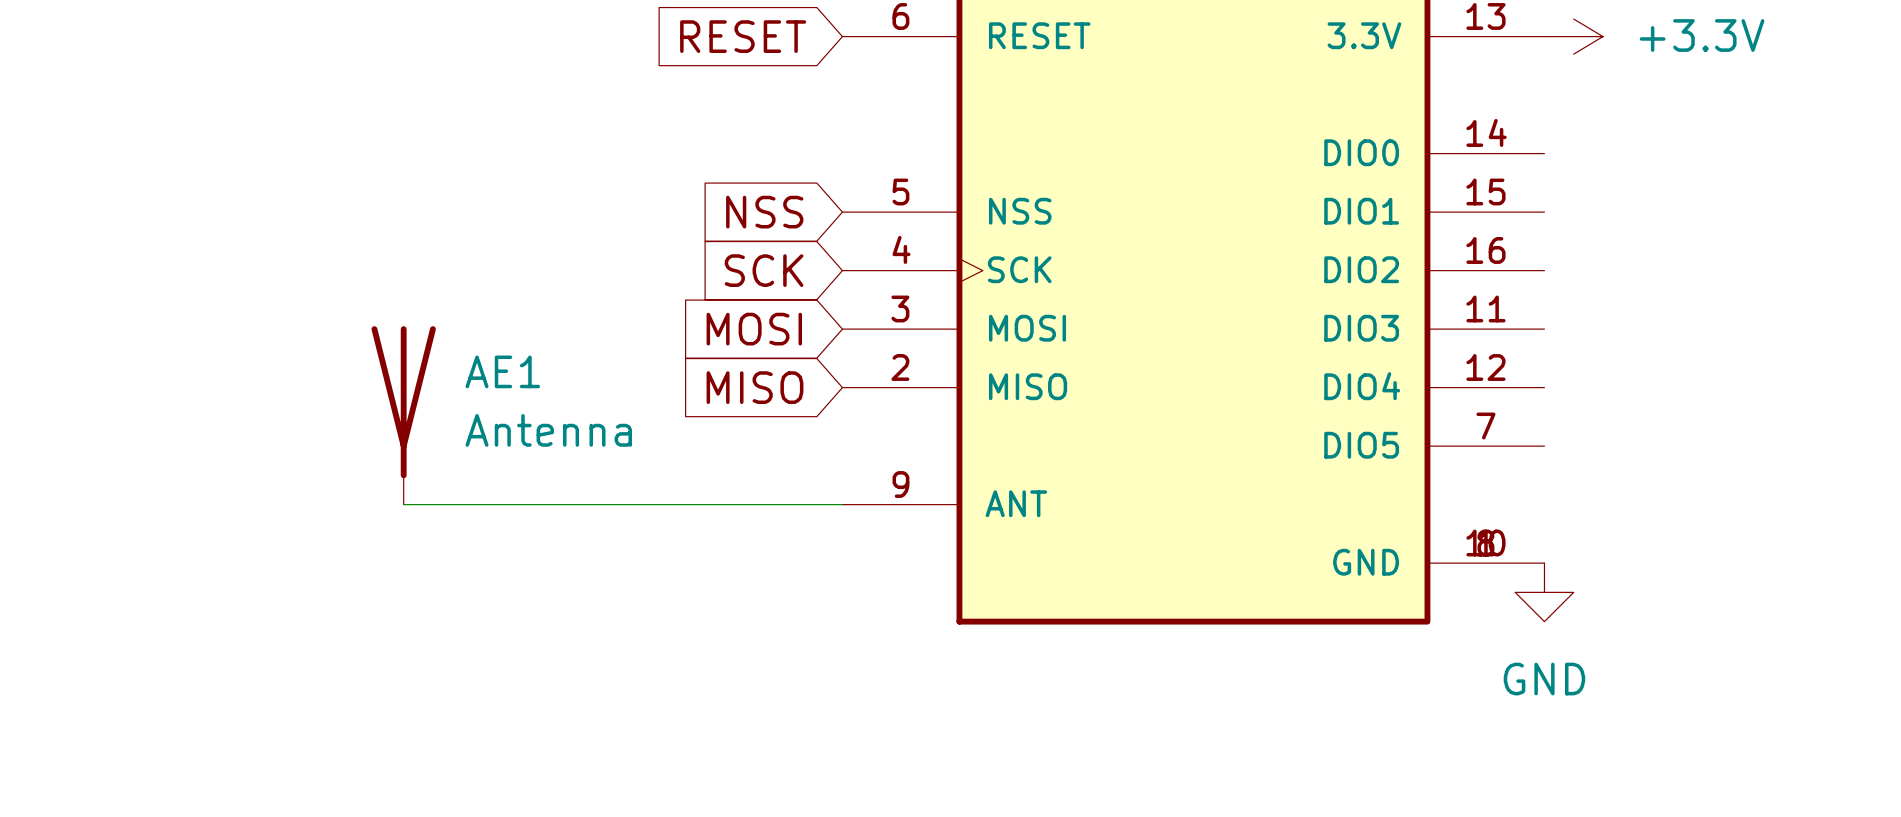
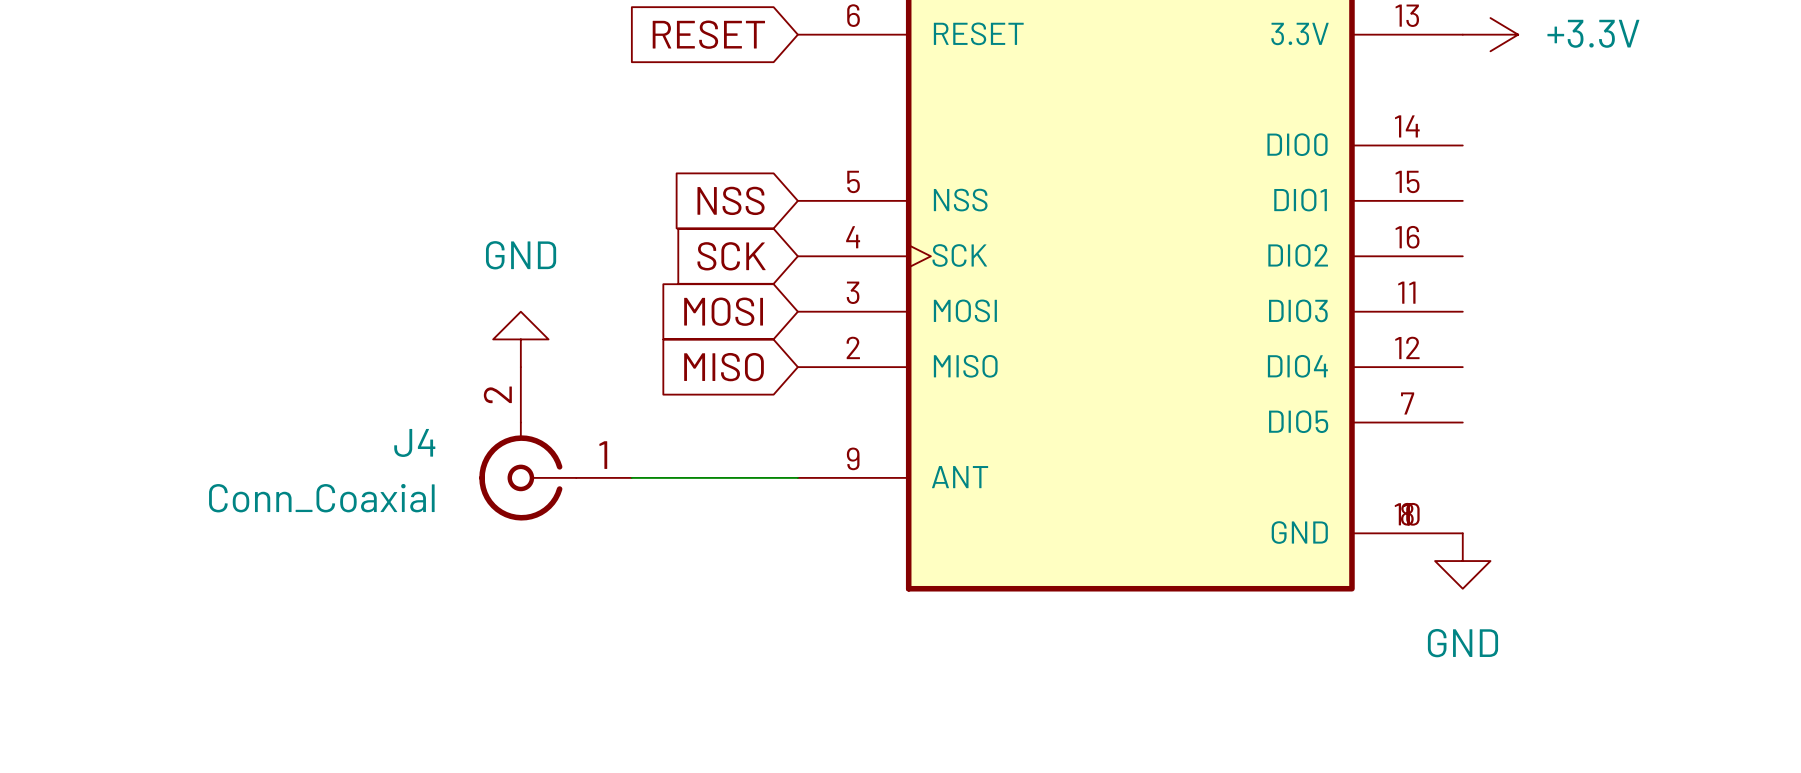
power symbol: none -> GND (520, 339)
AE1: Antenna (403, 415) -> none
J4: none -> Conn_Coaxial (555, 443)
wire: (403, 504) (666, 504) -> none

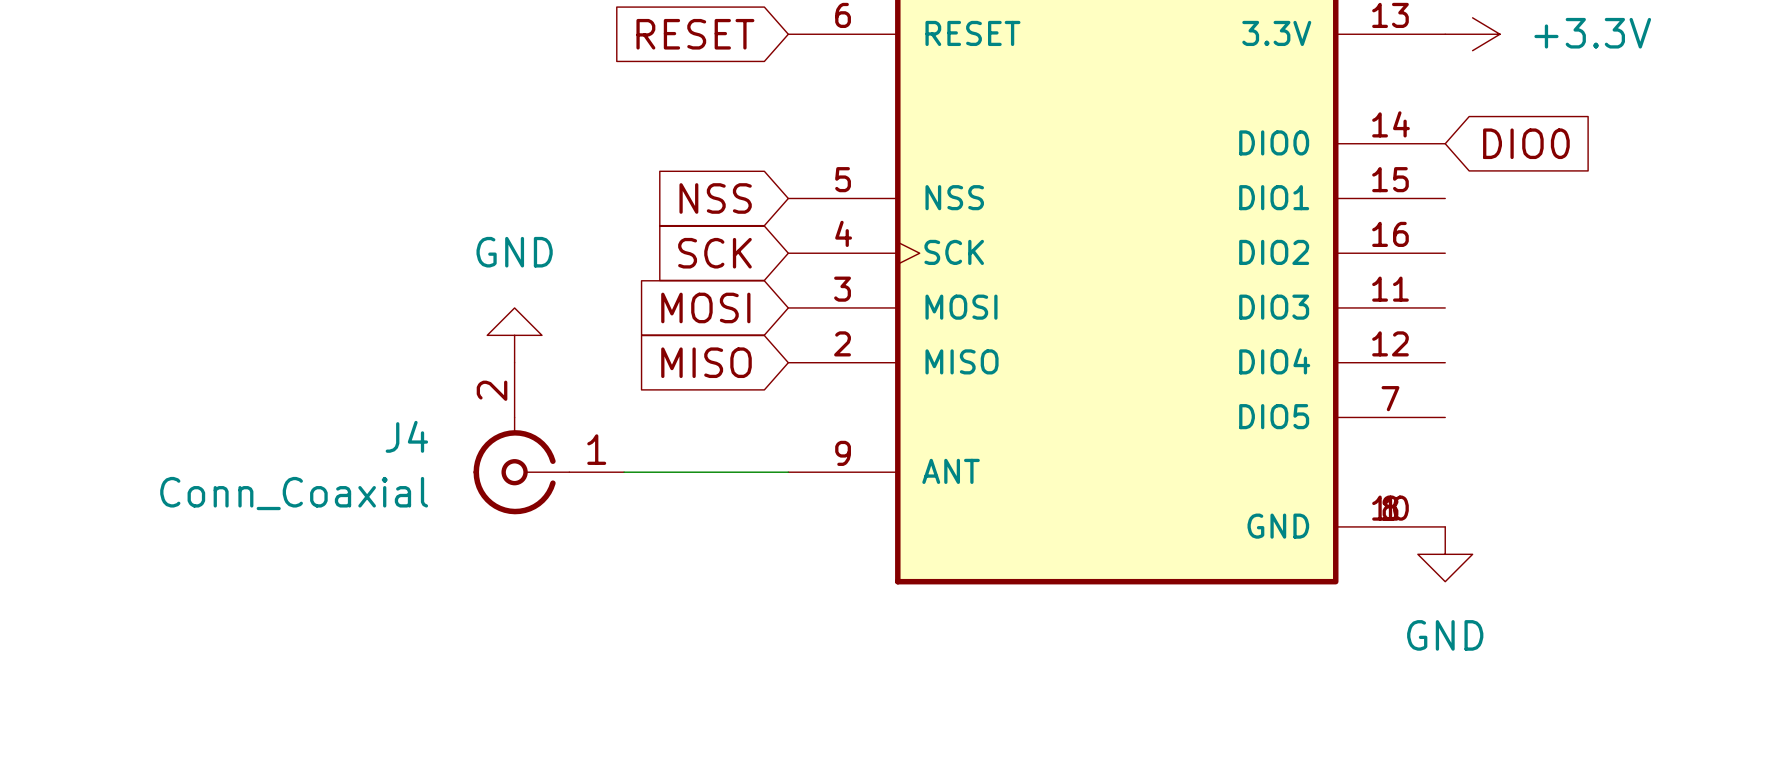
global label: none -> DIO0 (1526, 143)

